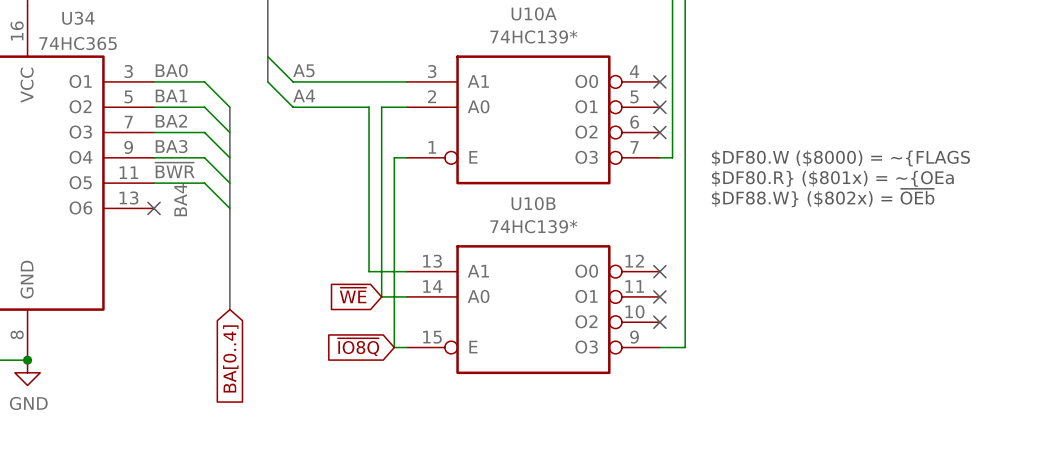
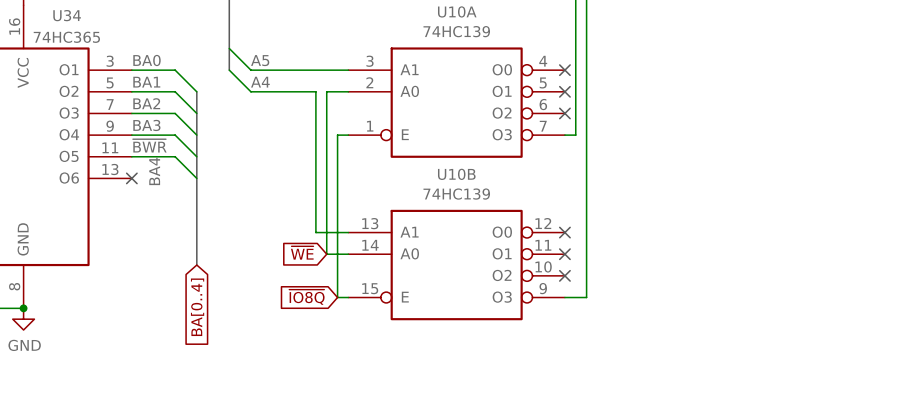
U10A value: 74HC139* (533, 36) -> 74HC139 (456, 31)
text: $DF80.W ($8000) = ~{FLAGS (840, 158) -> none
text: $DF80.R} ($801x) = ~{OEa (832, 178) -> none
text: $DF88.W} ($802x) = ~{OEb} (823, 198) -> none
U10B value: 74HC139* (533, 226) -> 74HC139 (456, 194)

